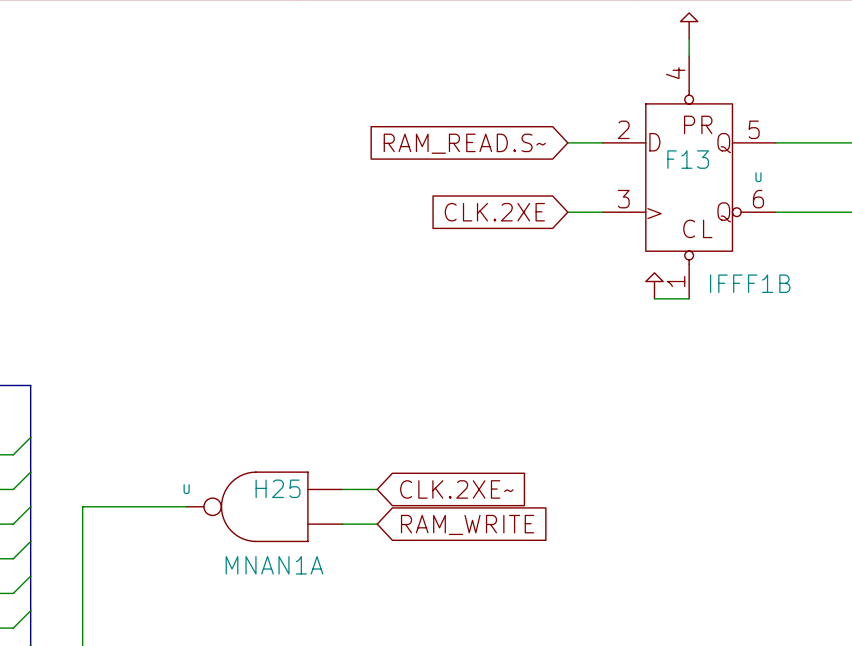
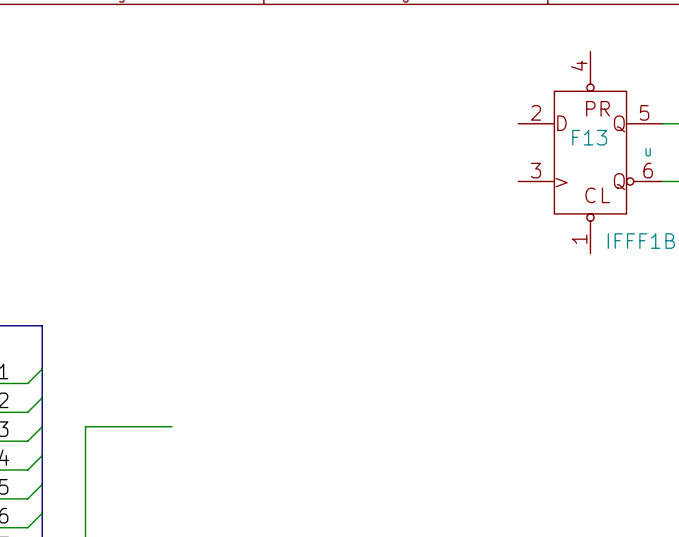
power symbol: (689, 25) -> none
wire: (689, 38) (689, 56) -> none
wire: (567, 142) (602, 142) -> none
global label: RAM_READ.S~ (464, 143) -> none
global label: CLK.2XE (494, 212) -> none
wire: (567, 212) (602, 212) -> none
power symbol: (654, 285) -> none
wire: (654, 298) (689, 298) -> none
wire: (342, 489) (377, 489) -> none
global label: CLK.2XE~ (456, 489) -> none
U: (264, 506) -> none
wire: (342, 524) (377, 524) -> none
global label: RAM_WRITE (467, 524) -> none

